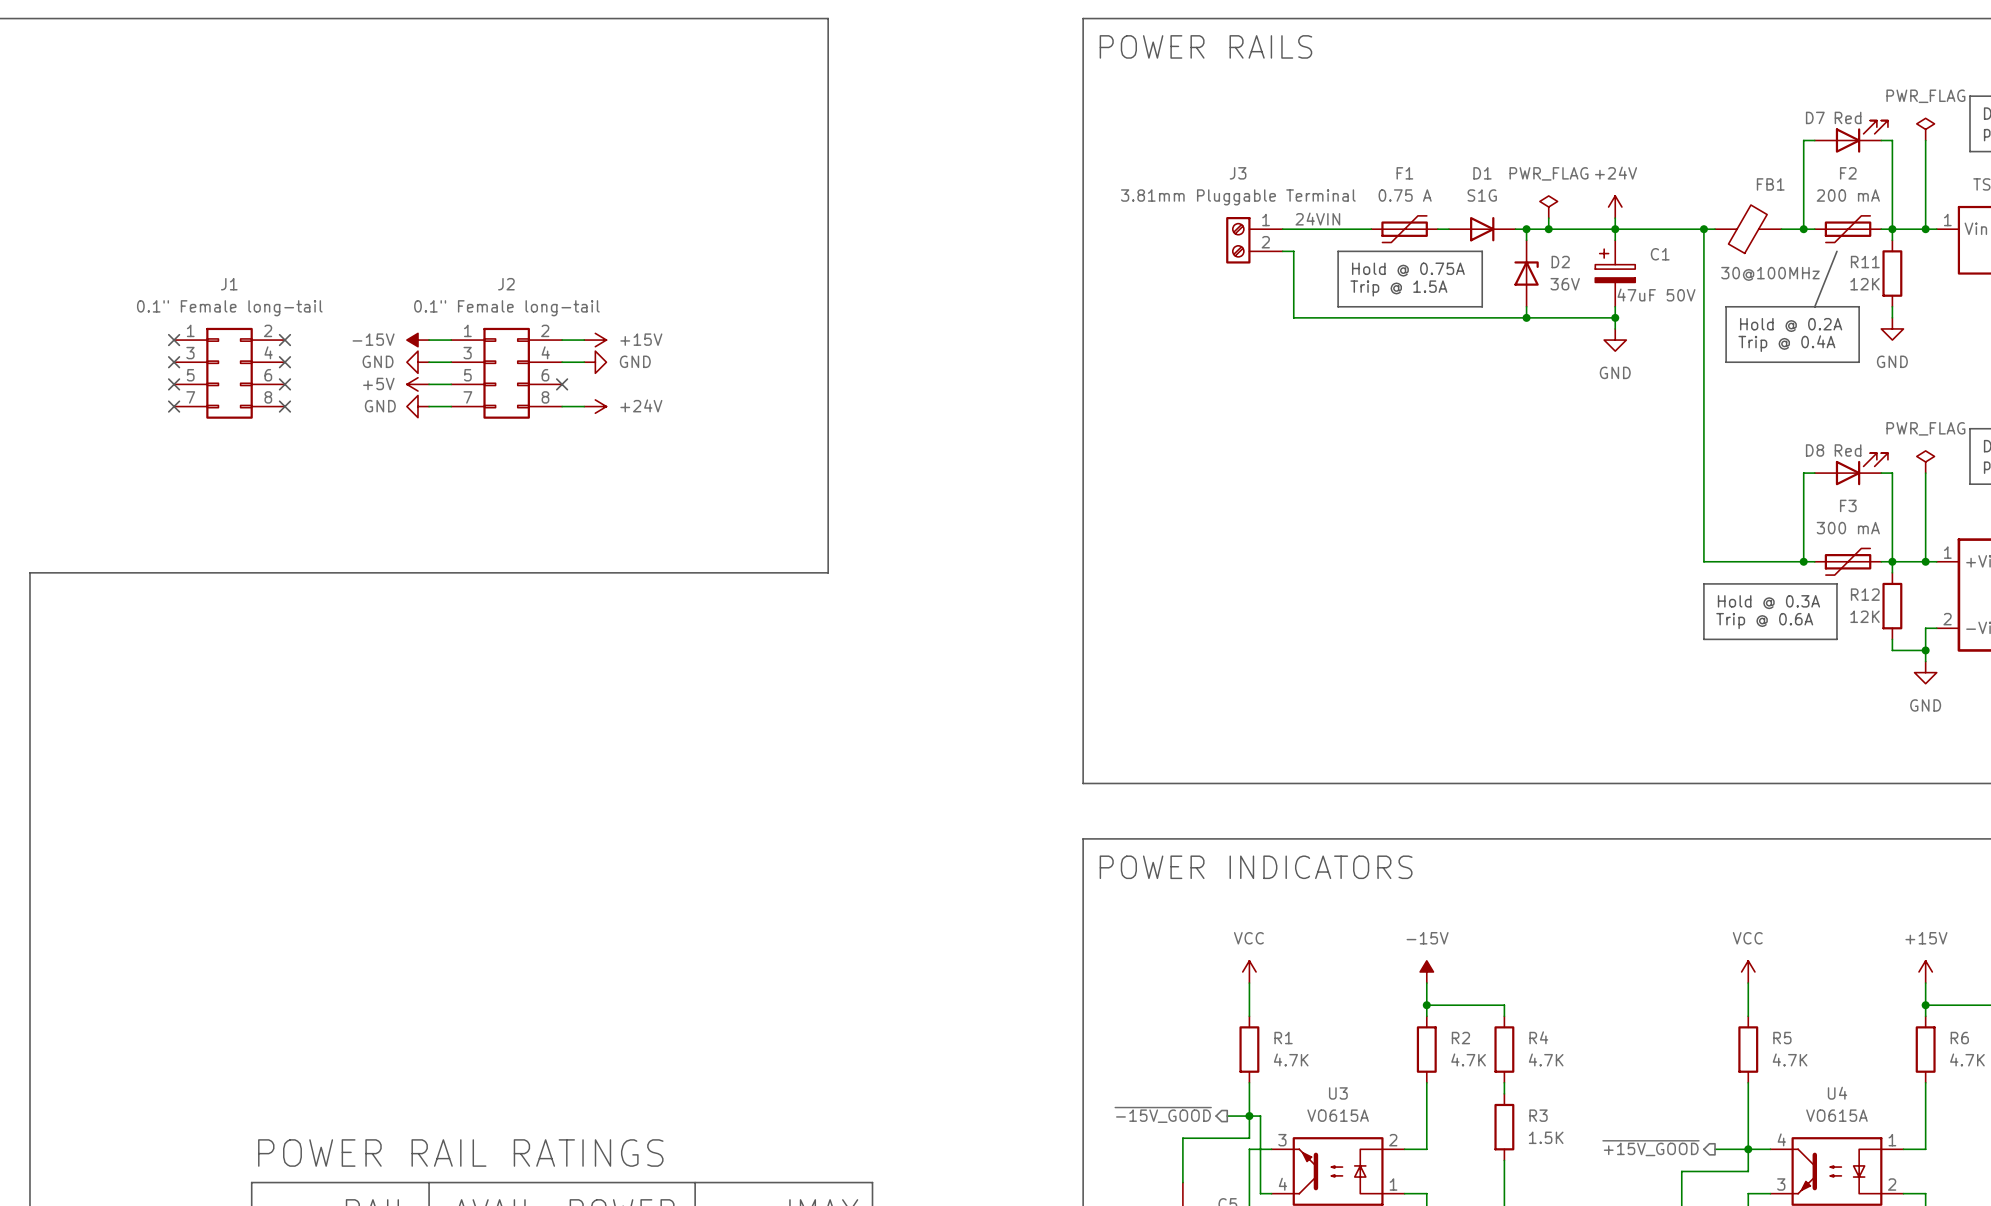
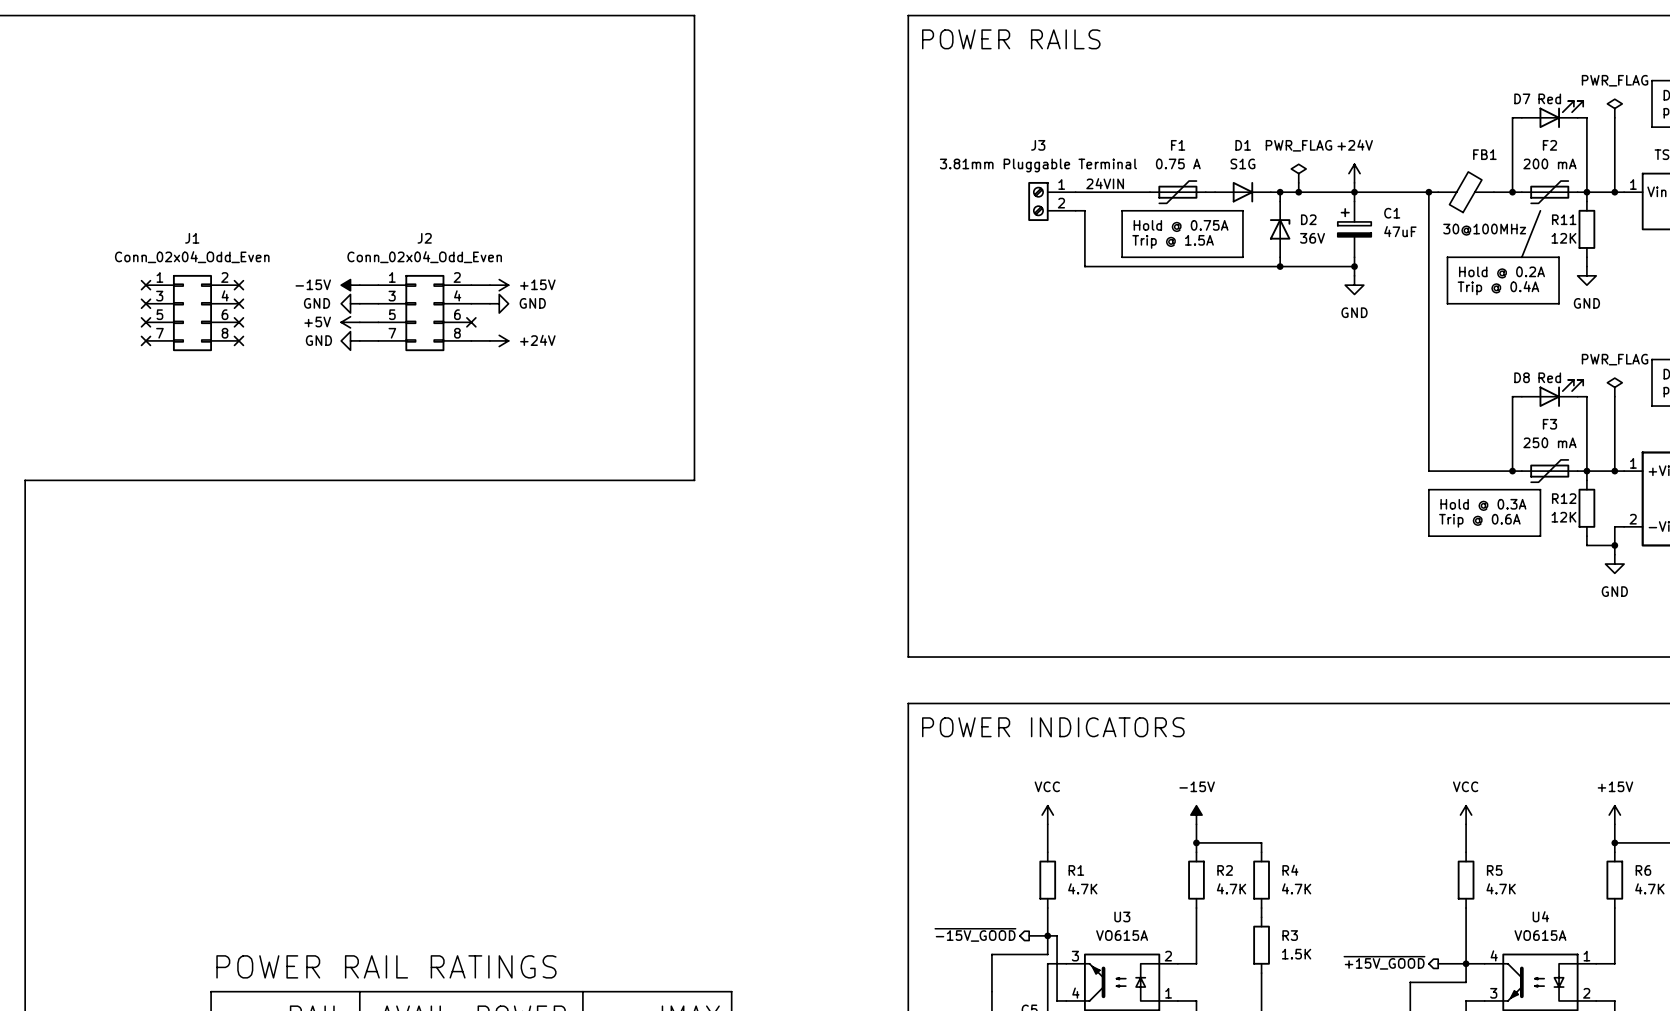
C1 value: 47uF 50V (1656, 295) -> 47uF (1400, 231)
J1 value: 0.1" Female long-tail (229, 308) -> Conn_02x04_Odd_Even (192, 257)
J2 value: 0.1" Female long-tail (506, 308) -> Conn_02x04_Odd_Even (424, 257)
F3 value: 300 mA (1848, 528) -> 250 mA (1549, 442)

